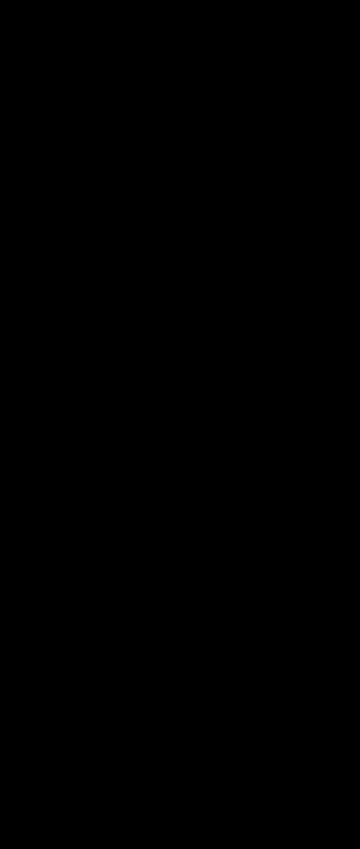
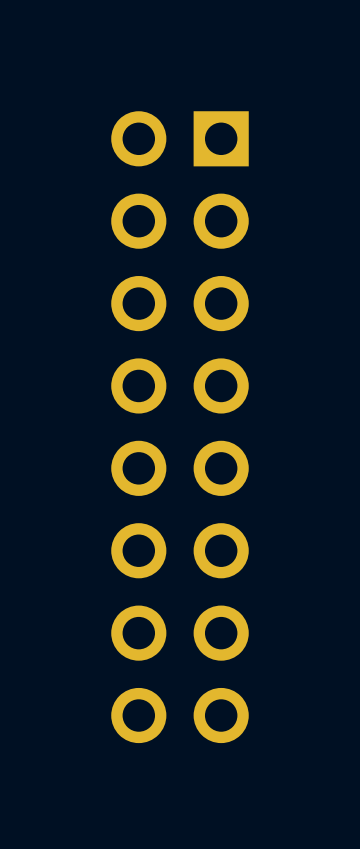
part: none -> (179, 427)

